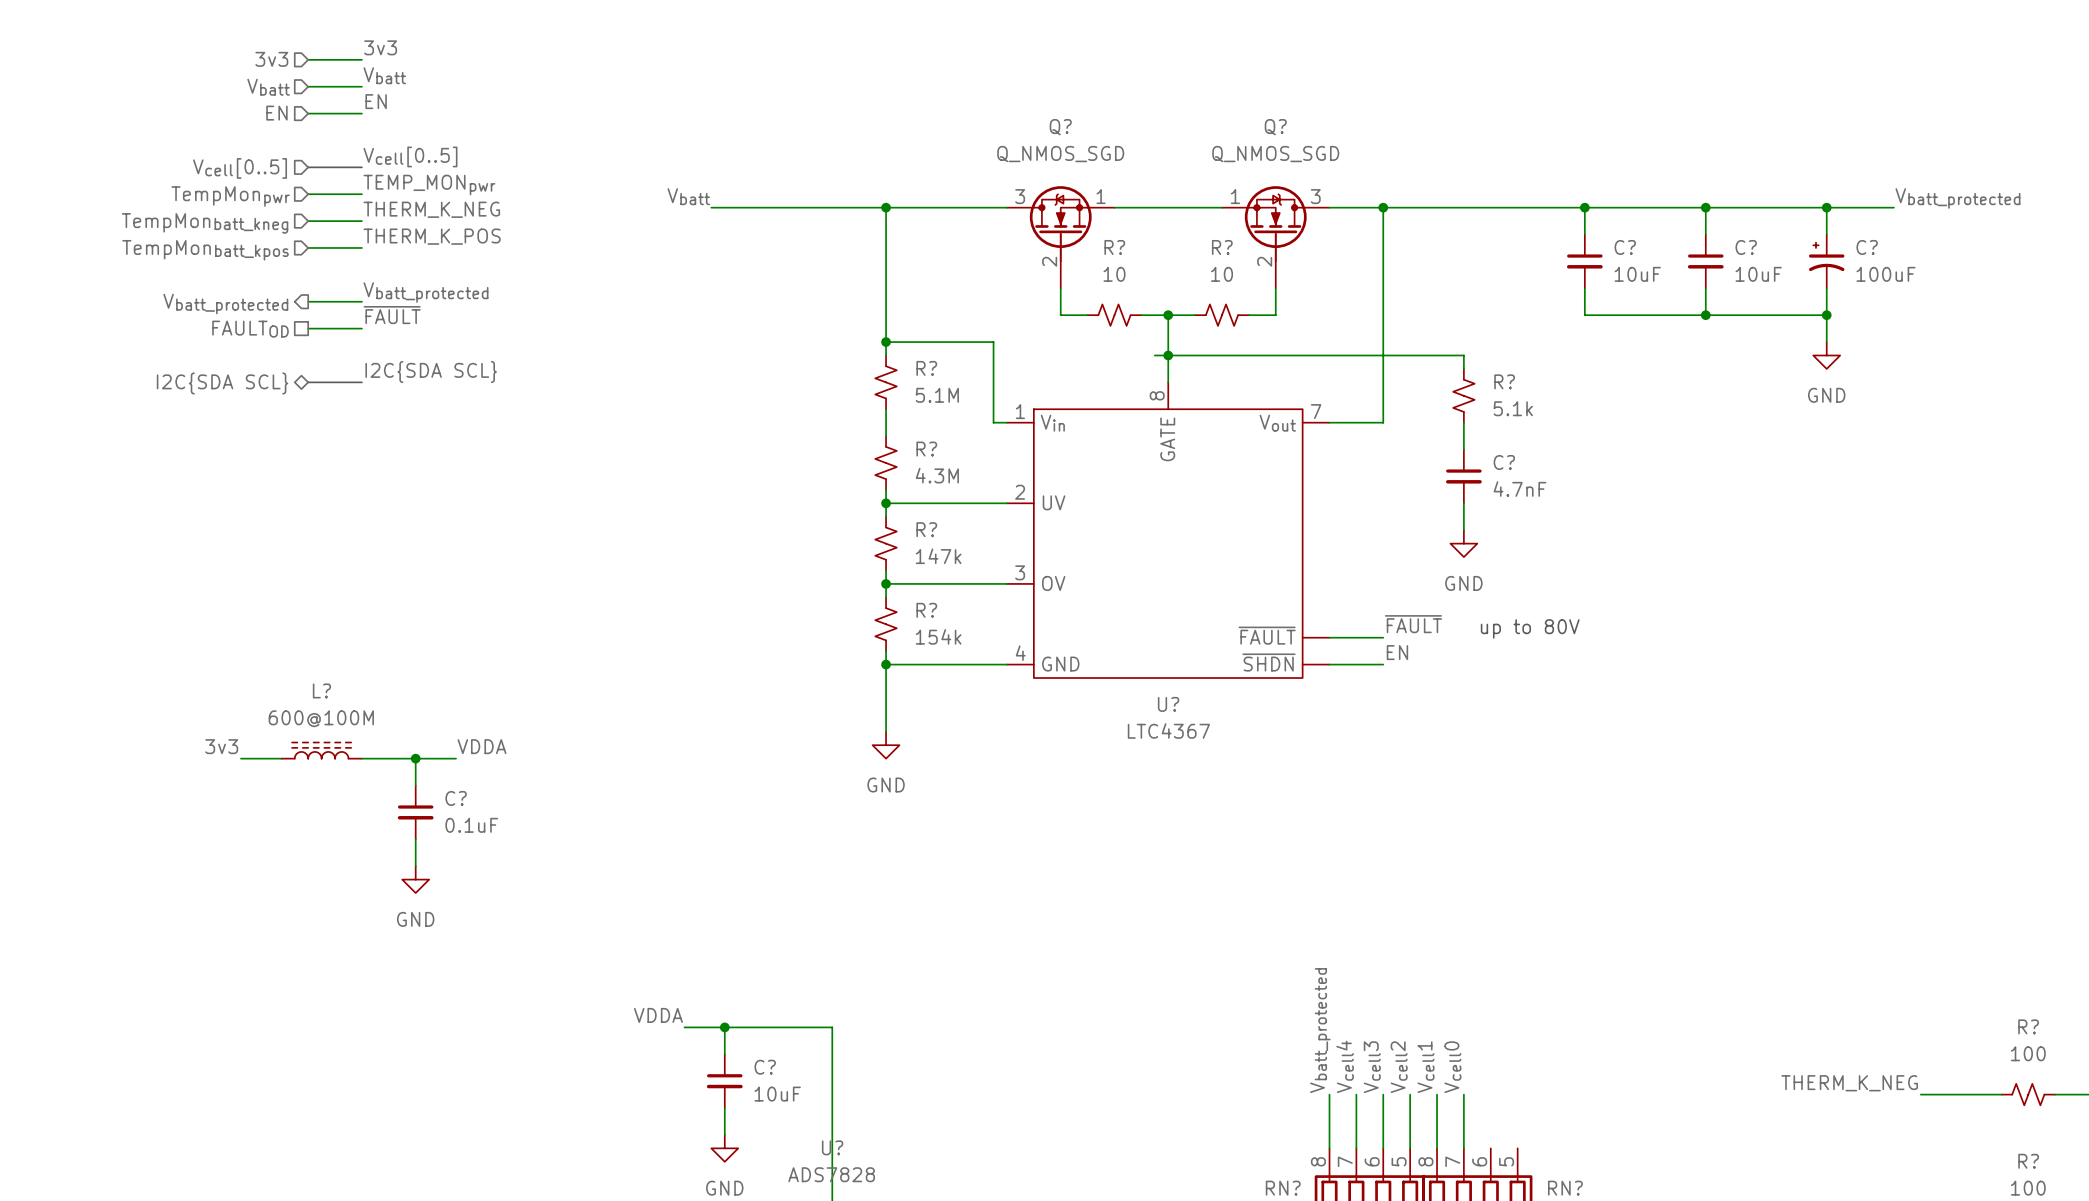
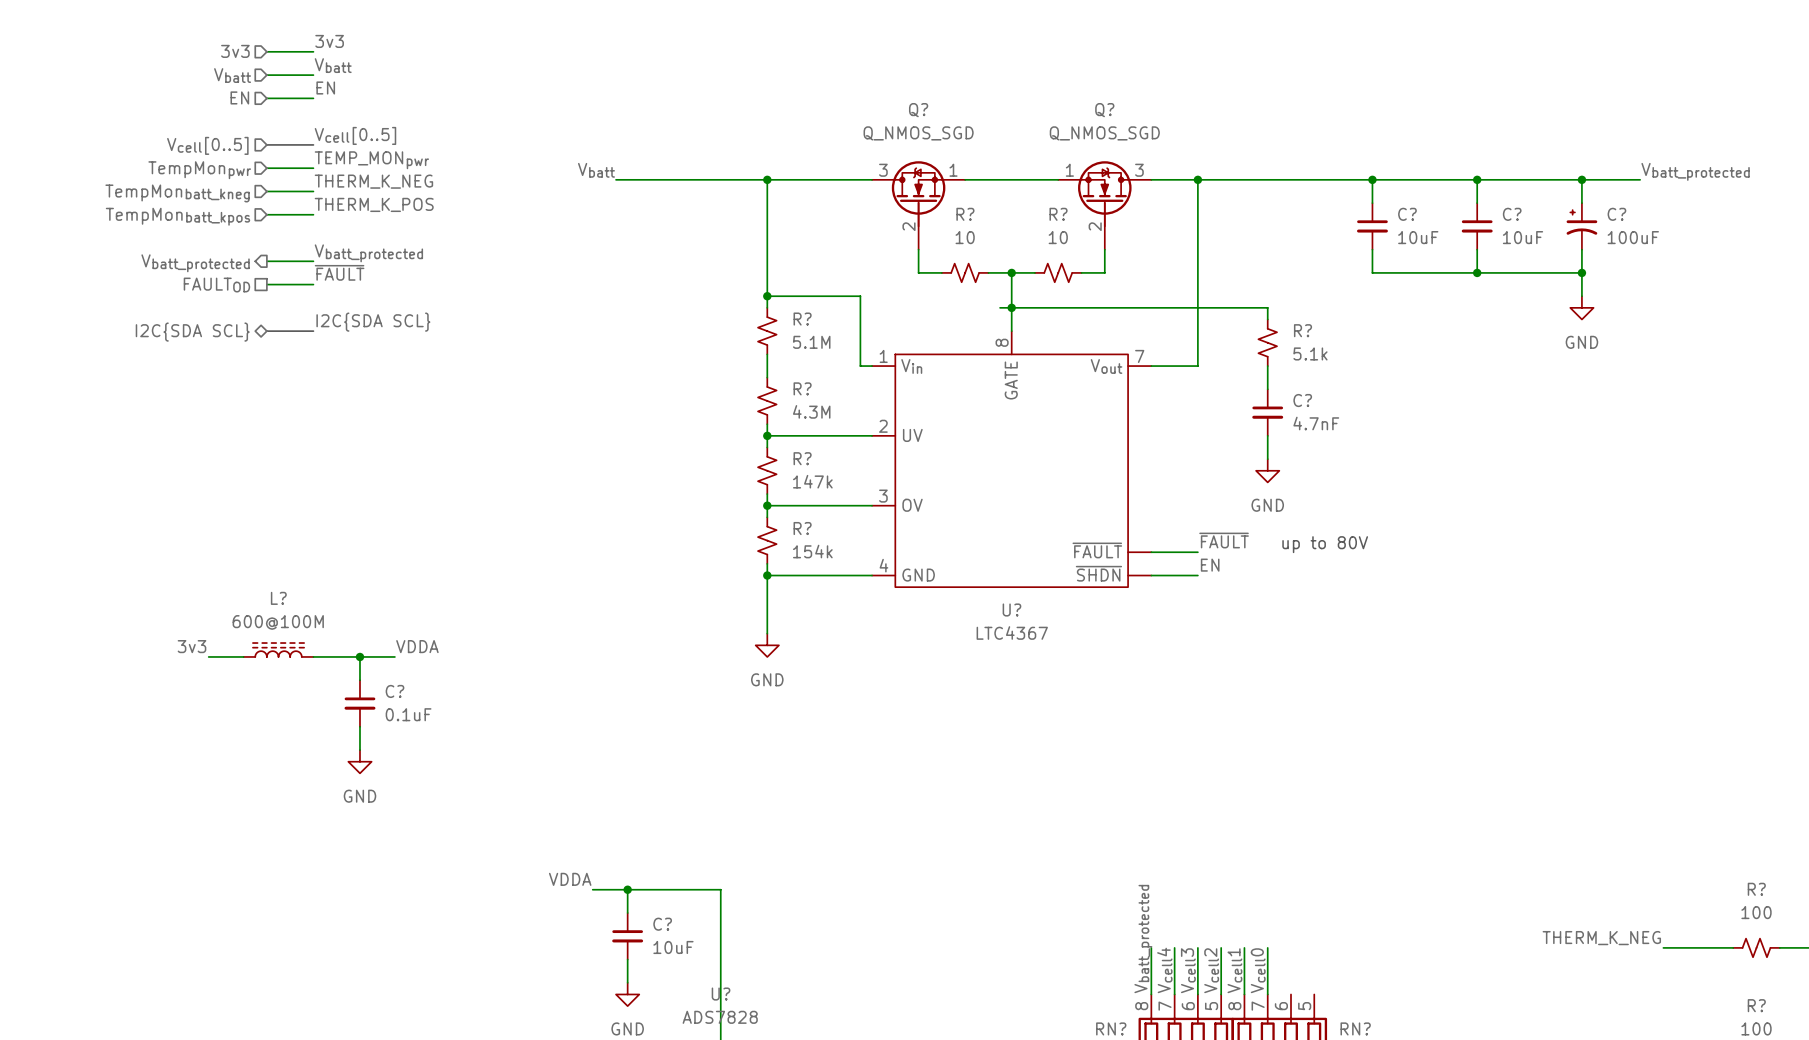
label position: Vbatt_protected (1320, 1030) -> Vbatt_protected (1143, 939)
label position: Vcell4 (1345, 1066) -> Vcell4 (1164, 970)
label position: Vcell3 (1372, 1067) -> Vcell3 (1188, 970)
label position: Vcell2 (1399, 1067) -> Vcell2 (1211, 970)
label position: Vcell1 (1426, 1067) -> Vcell1 (1234, 970)
label position: Vcell0 (1452, 1067) -> Vcell0 (1258, 970)

